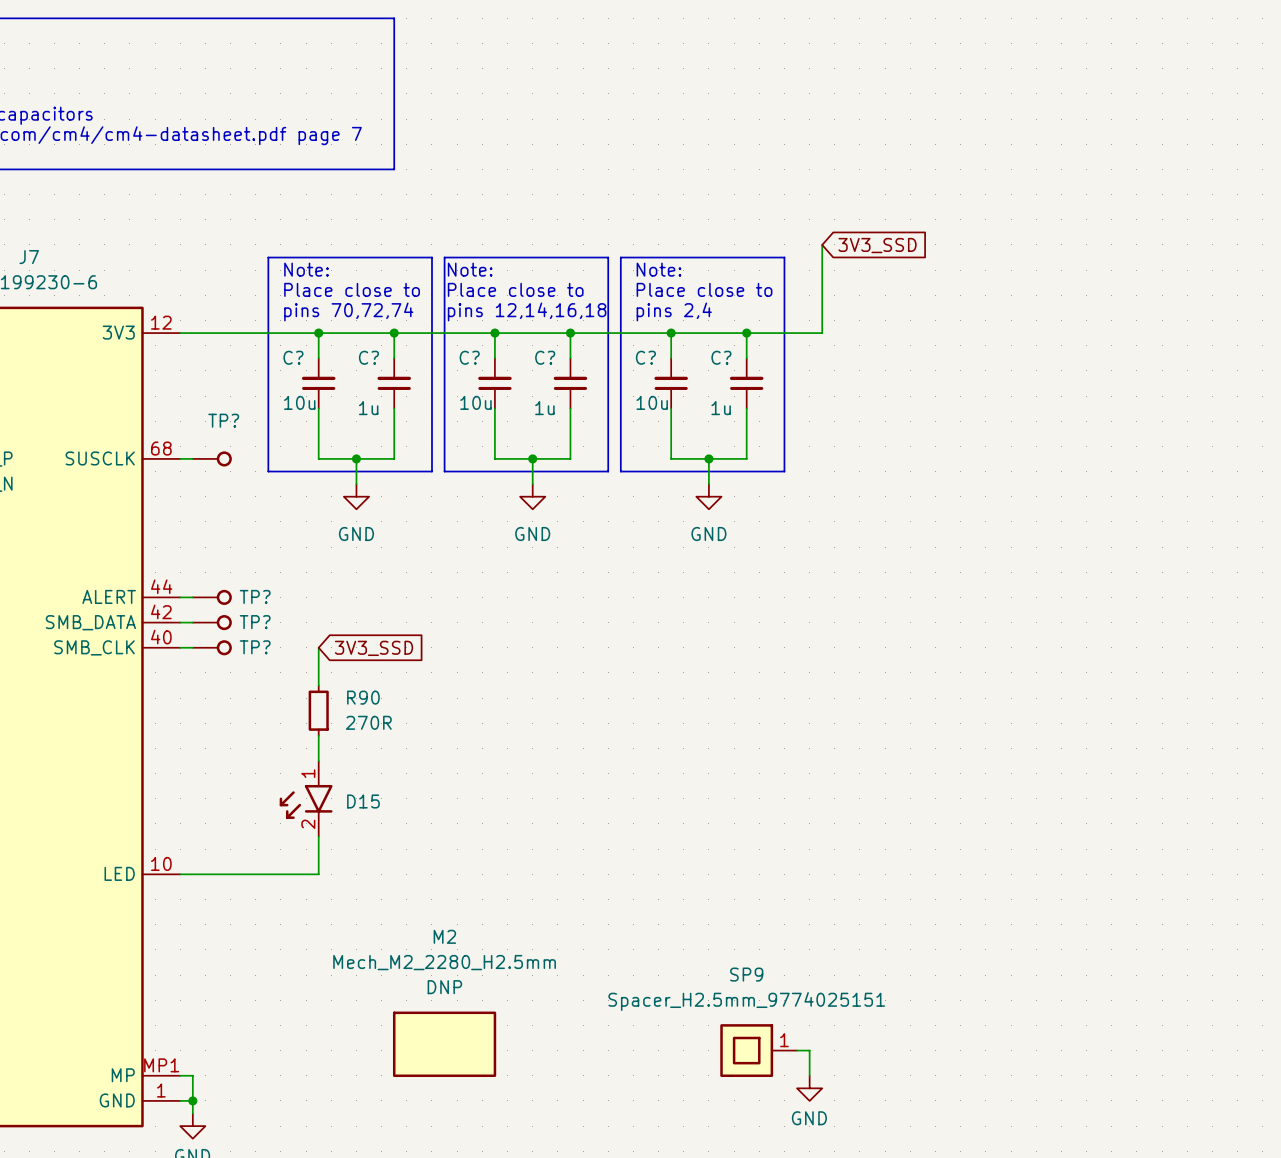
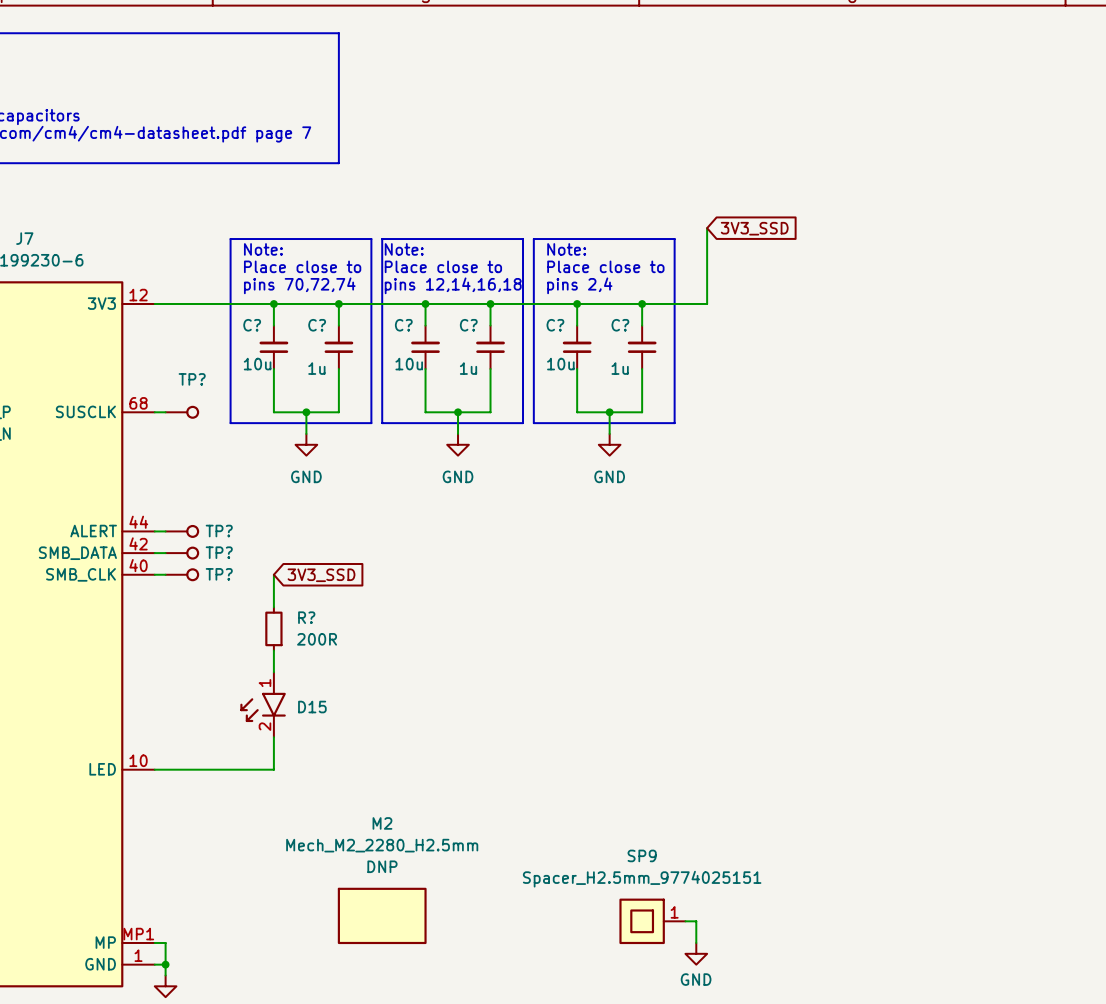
R90 name: R90 (363, 697) -> R? (306, 617)
R90 text: 270R (368, 722) -> 200R (317, 639)

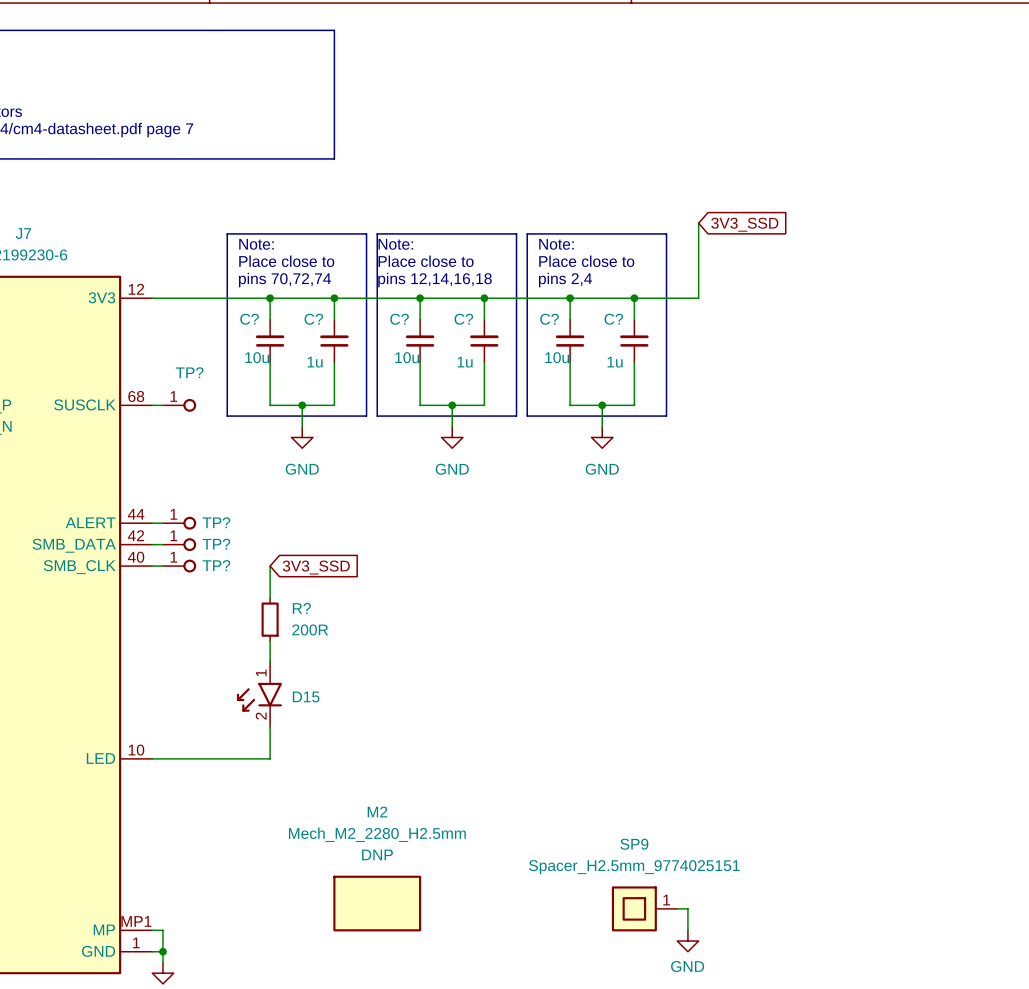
TP? pin number: none -> 1 (173, 396)
TP? pin number: none -> 1 (173, 514)
TP? pin number: none -> 1 (173, 535)
TP? pin number: none -> 1 (173, 557)

